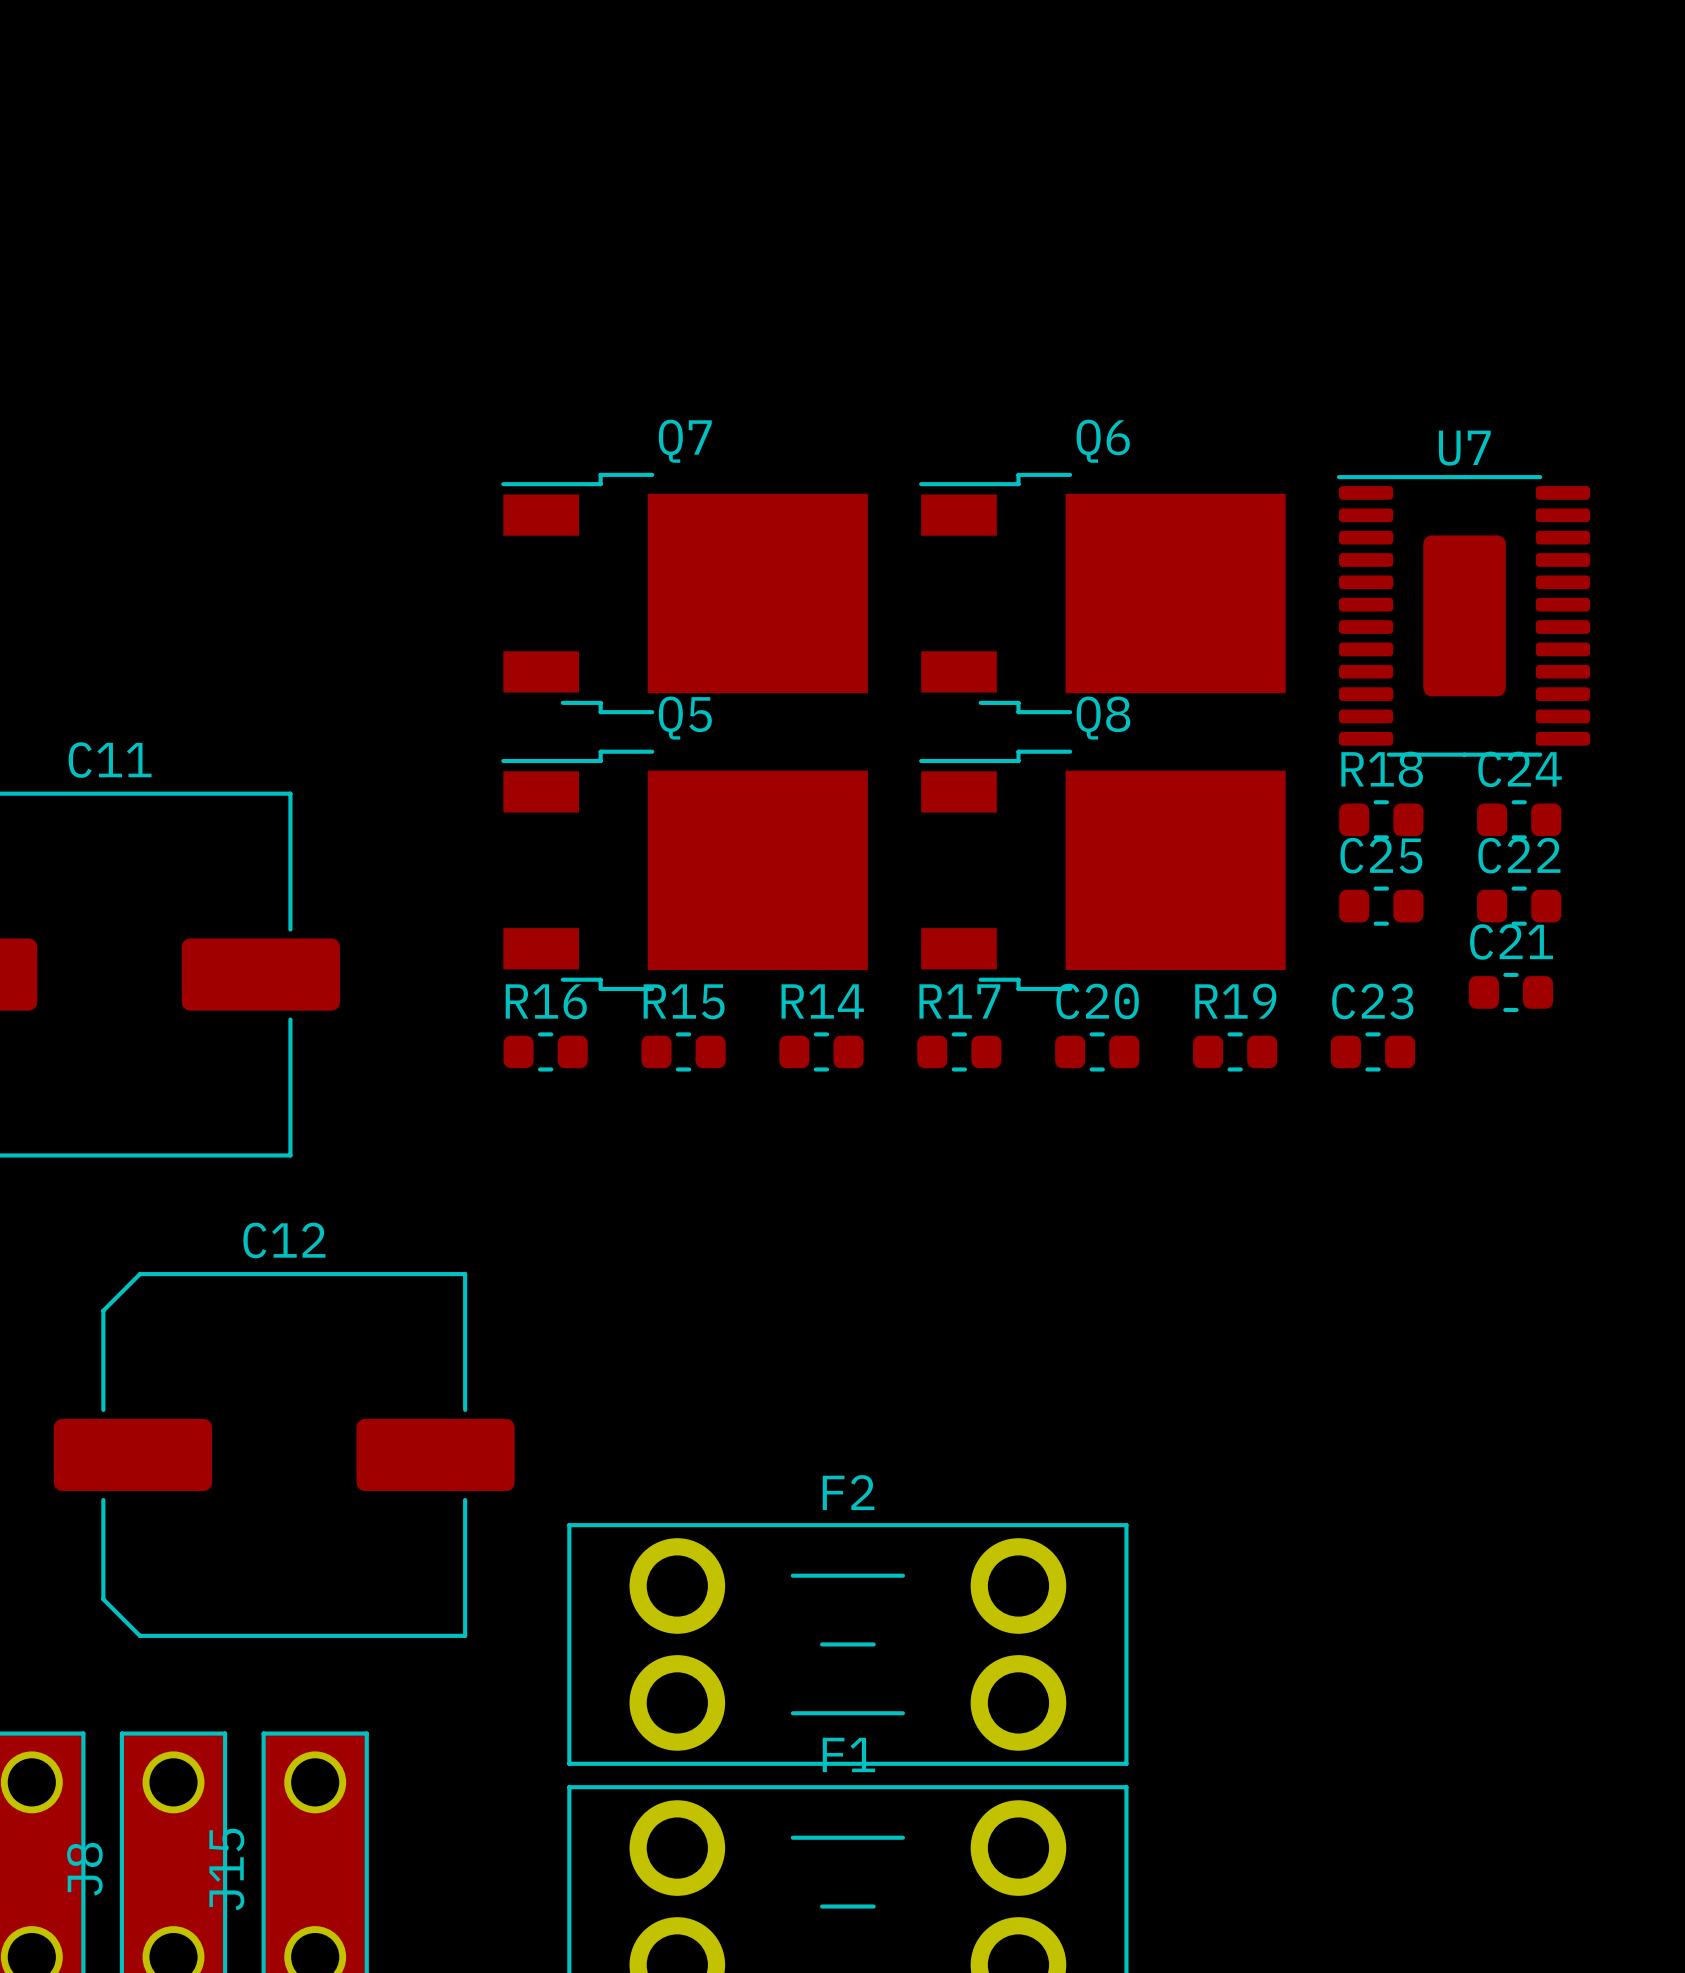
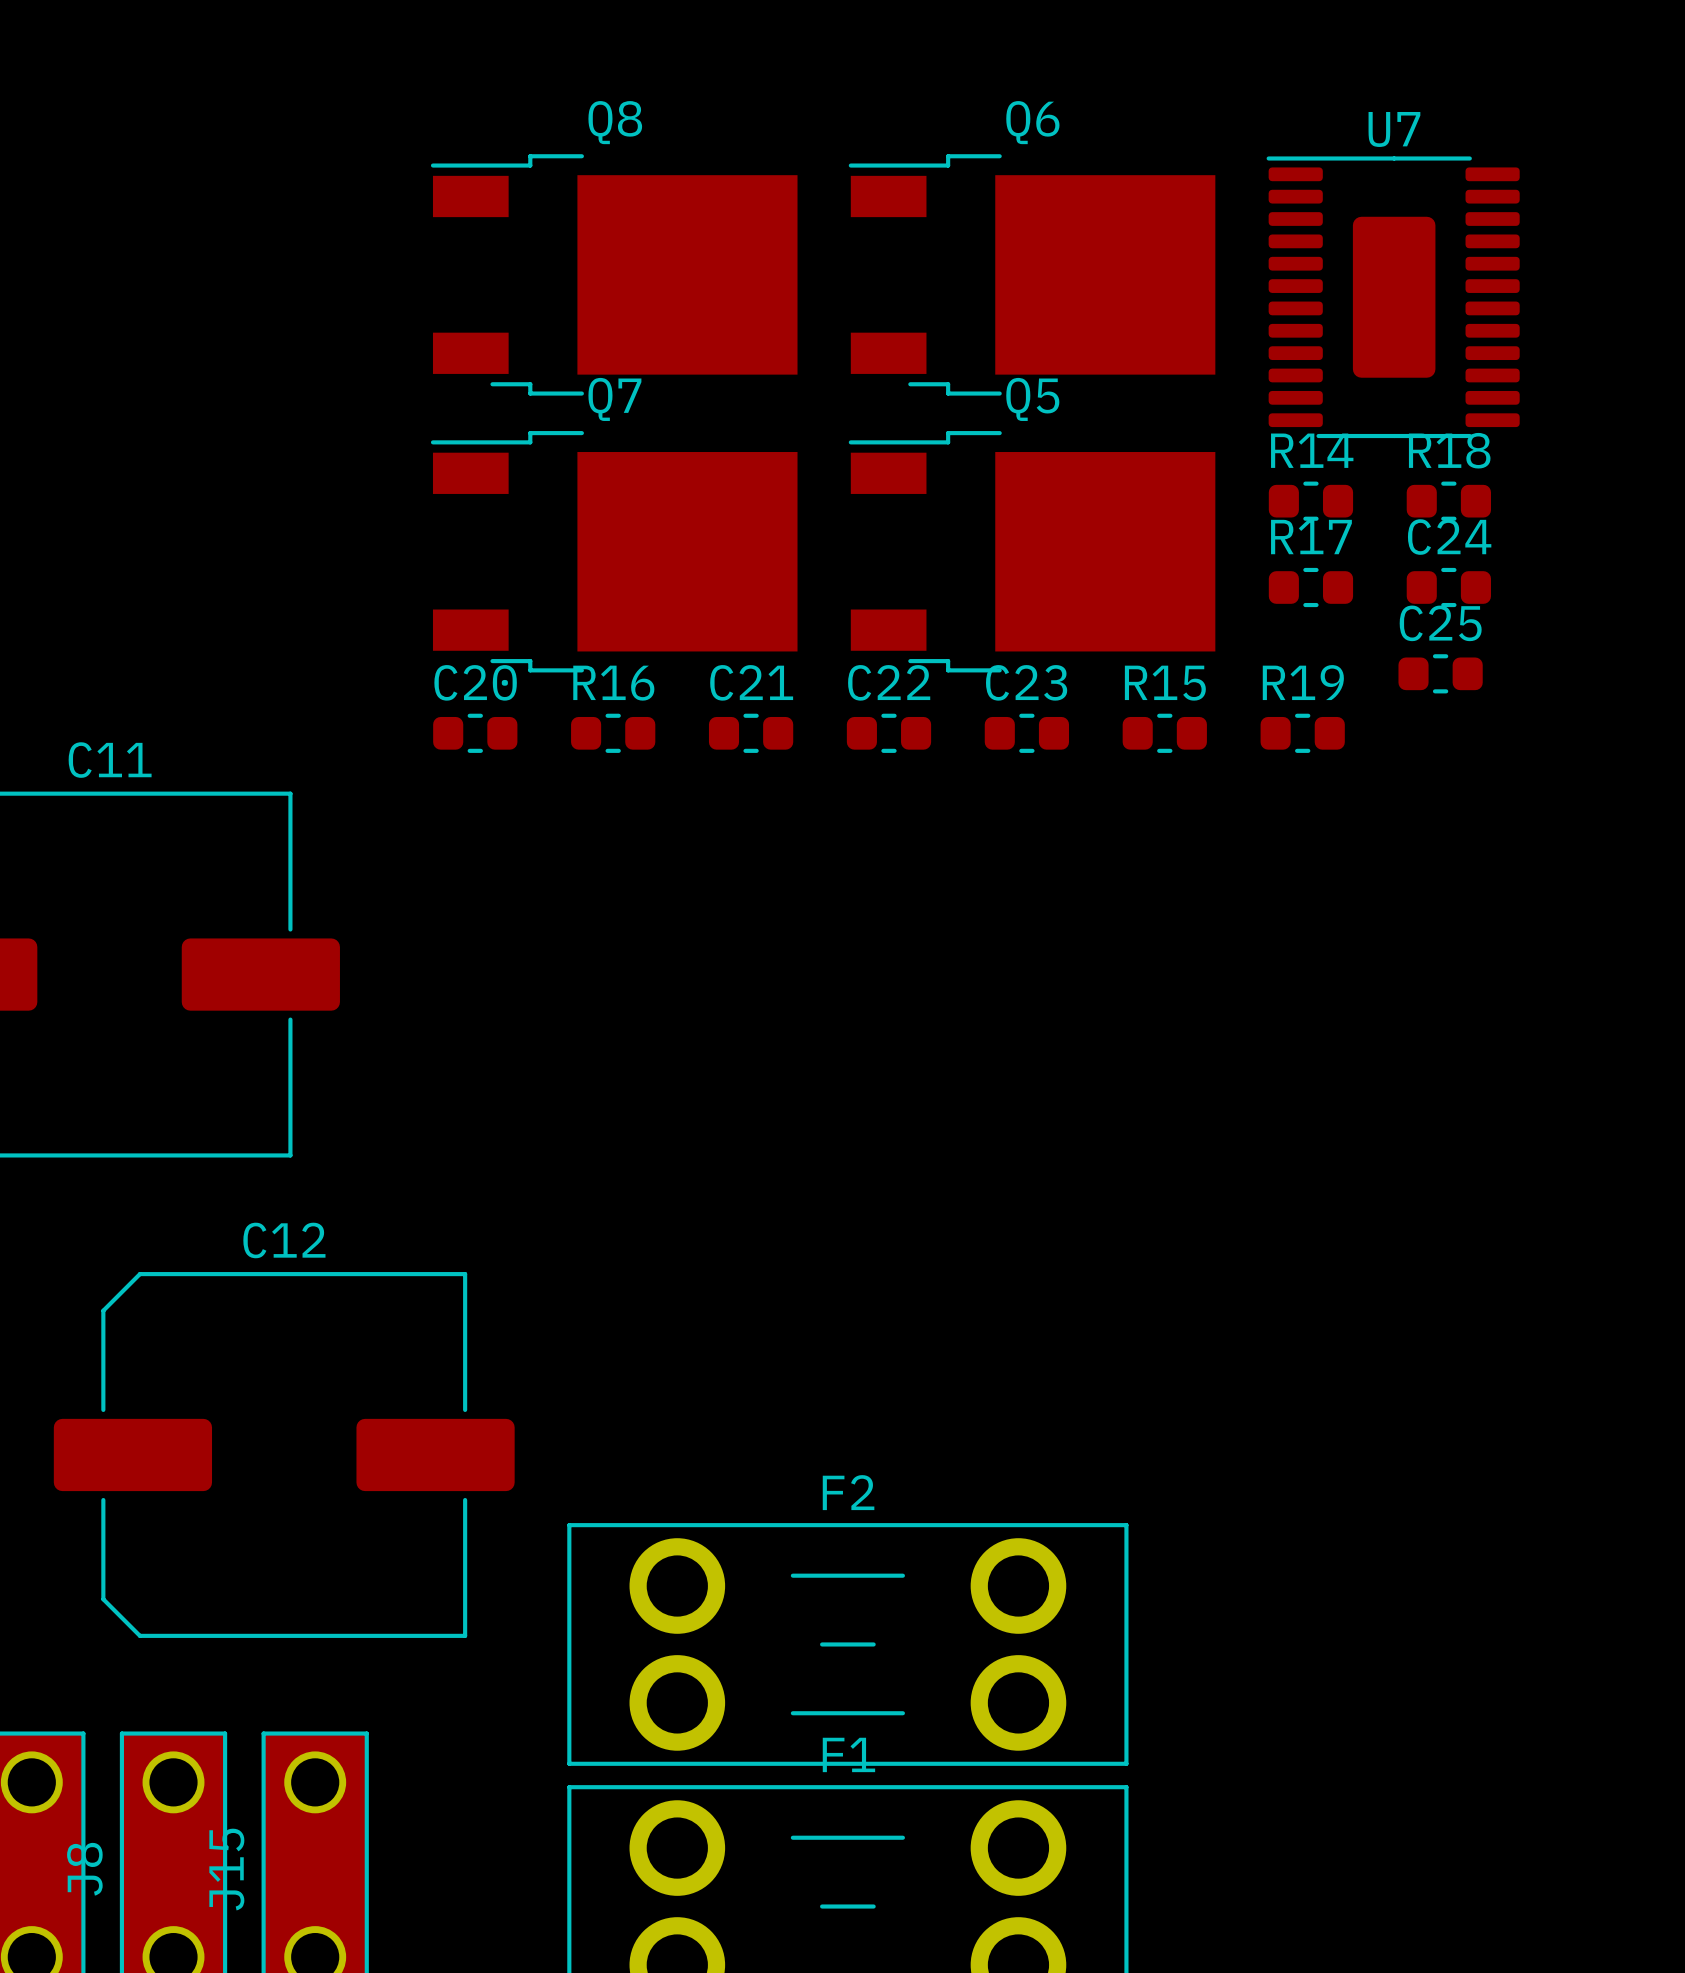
Q7 position: (684, 593) -> (614, 551)
Q6 position: (1102, 593) -> (1032, 274)
U7 position: (1463, 615) -> (1393, 297)
R18 position: (1381, 819) -> (1448, 501)
C24 position: (1519, 819) -> (1448, 587)
Q5 position: (684, 870) -> (1032, 551)
Q8 position: (1102, 870) -> (614, 274)
C25 position: (1381, 906) -> (1440, 673)
C22 position: (1519, 906) -> (888, 733)
C21 position: (1510, 992) -> (751, 733)
R16 position: (545, 1051) -> (613, 733)
R15 position: (683, 1051) -> (1164, 733)
R14 position: (821, 1051) -> (1310, 501)
R17 position: (959, 1051) -> (1310, 587)
C20 position: (1097, 1051) -> (475, 733)
R19 position: (1235, 1051) -> (1302, 733)
C23 position: (1373, 1051) -> (1026, 733)

